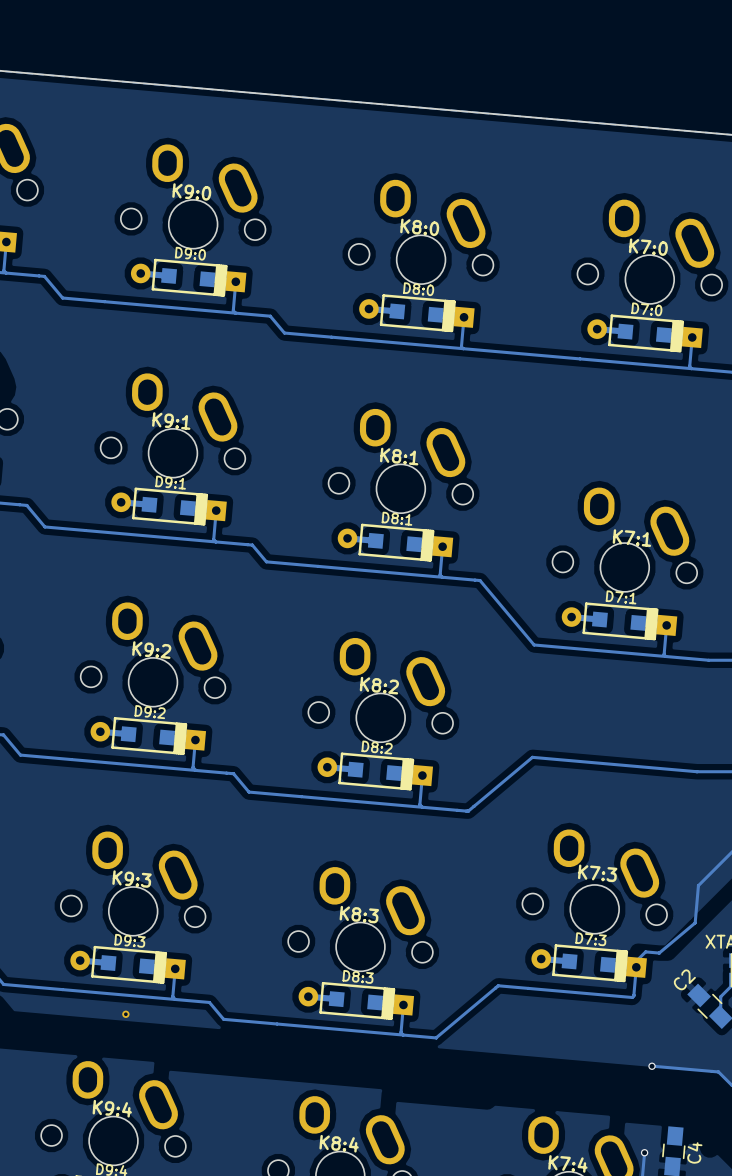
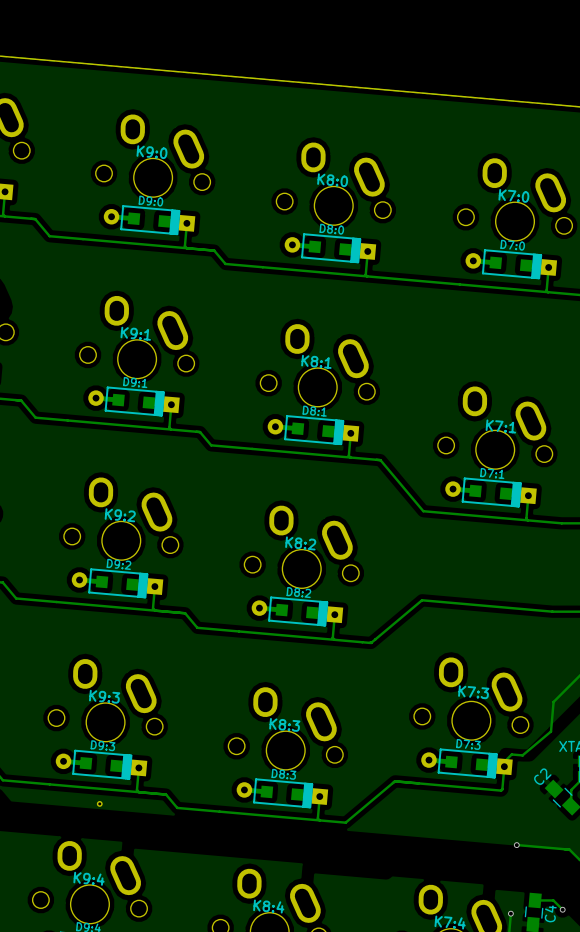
track: none -> (535, 900) (553, 900) (562, 909)
via: none -> (562, 909)

